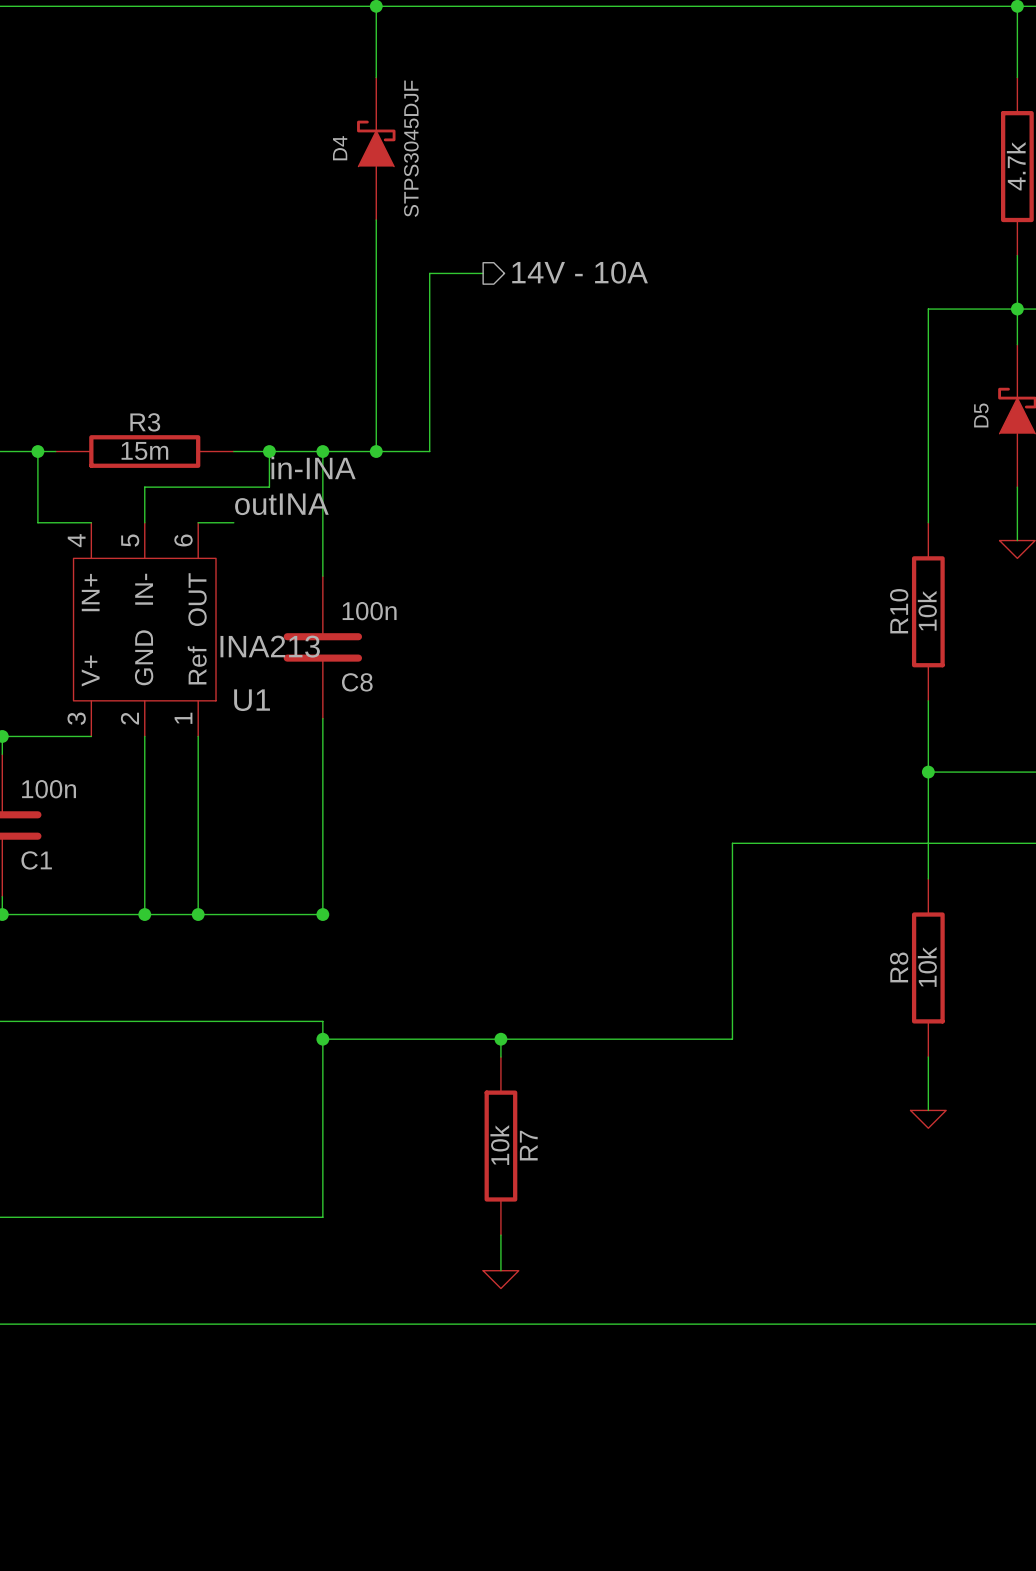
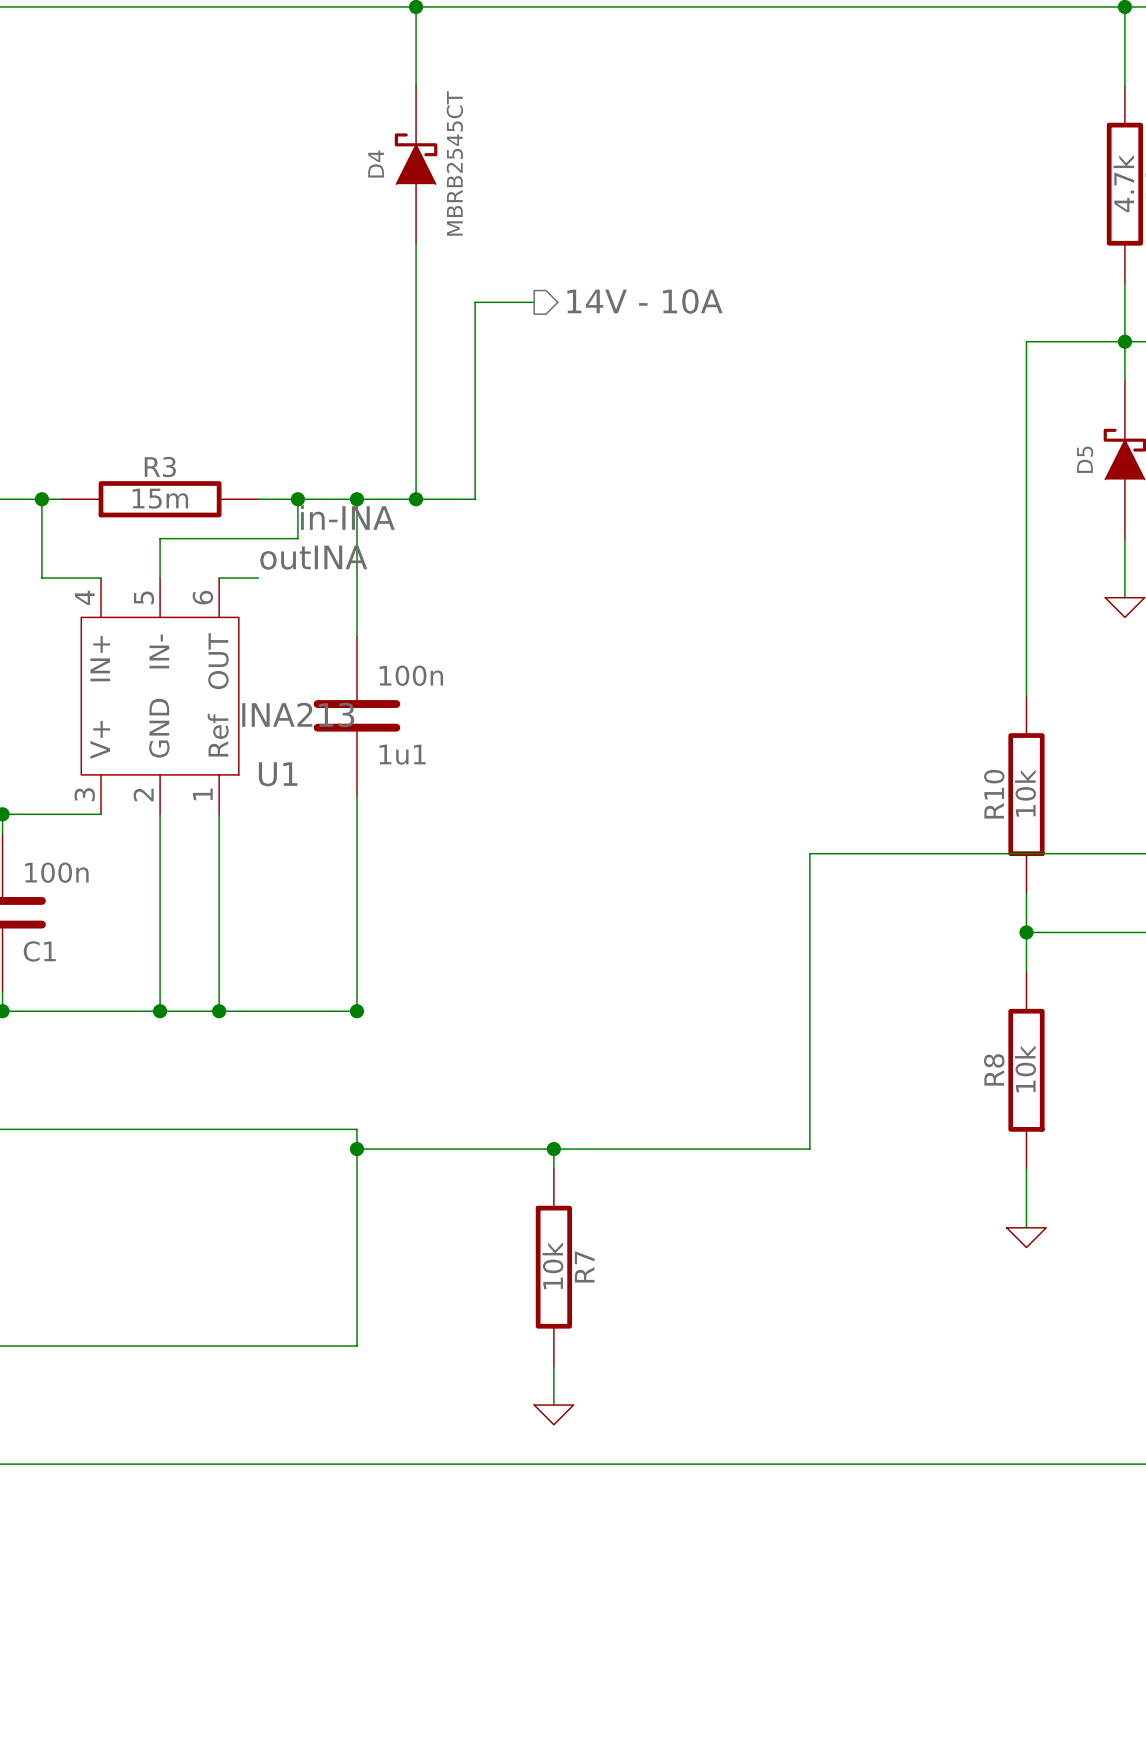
D4 value: STPS3045DJF (411, 148) -> MBRB2545CT (454, 163)
R10 position: (928, 611) -> (1026, 794)
C8 name: C8 (357, 682) -> 1u1 (402, 754)
wire: (928, 700) (928, 807) -> (1026, 578) (1026, 696)
junction position: (928, 772) -> (1026, 932)
wire: (732, 843) (928, 843) -> (809, 932) (809, 853) (1026, 853)

